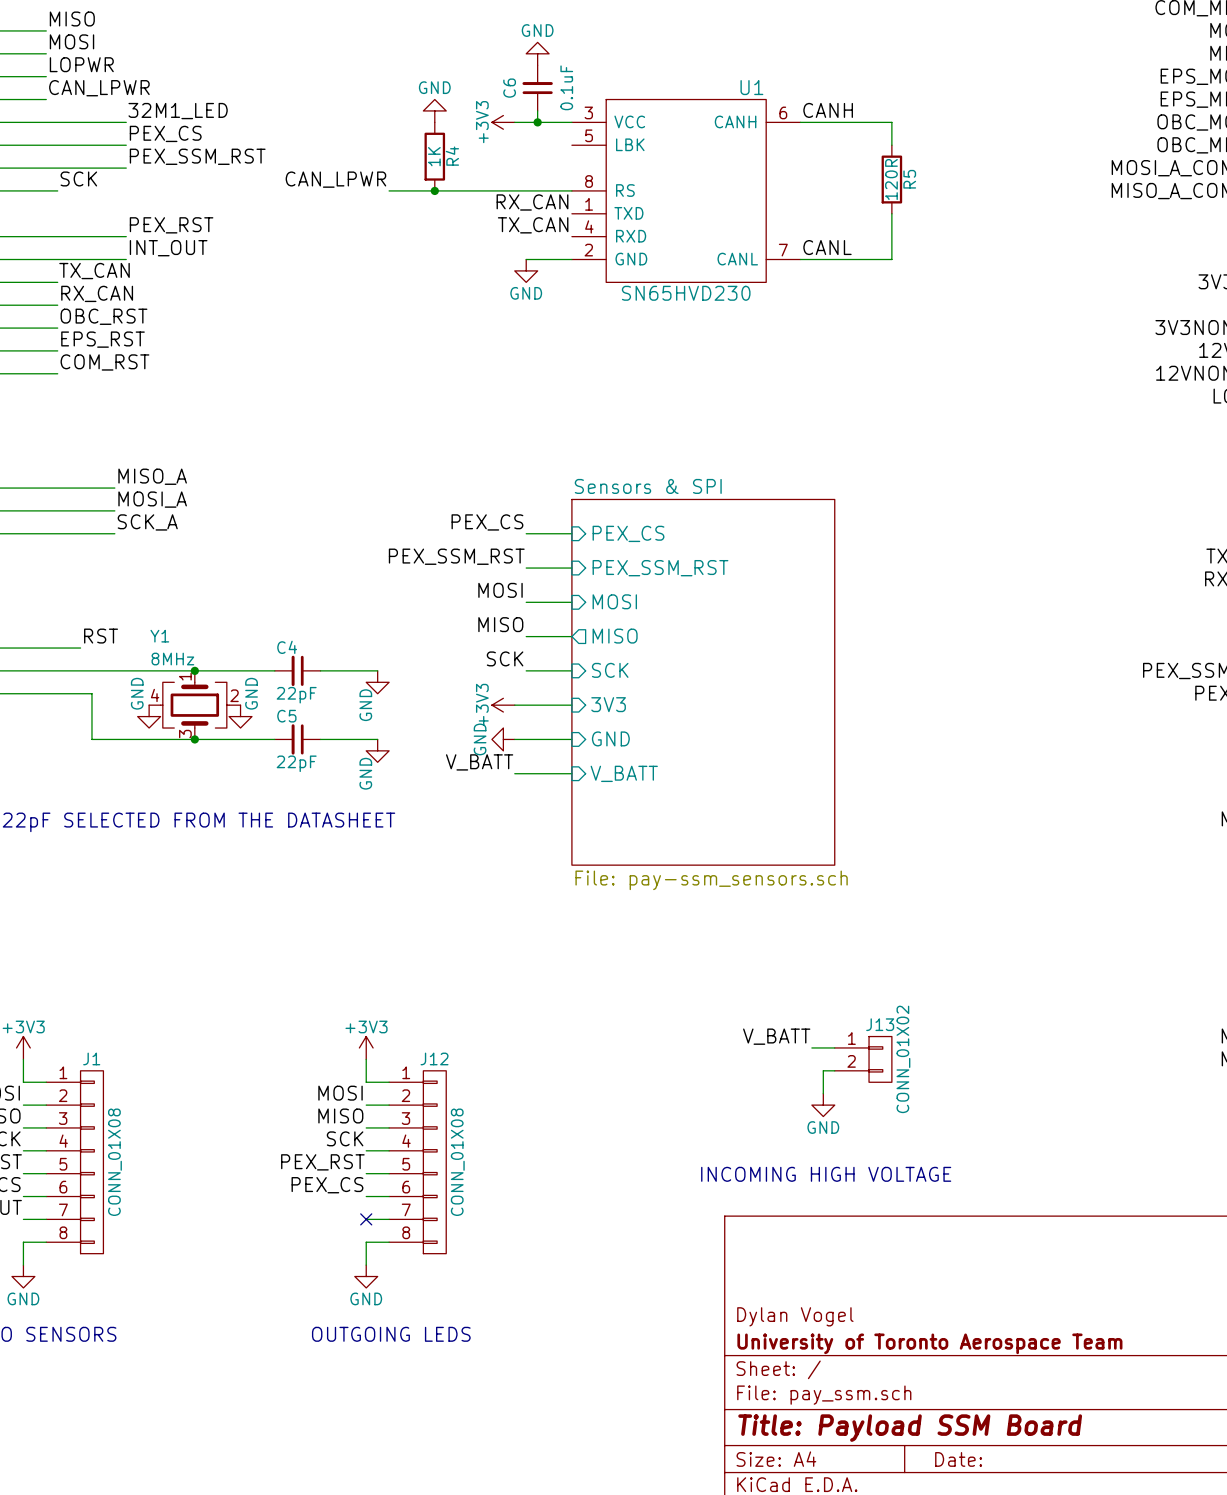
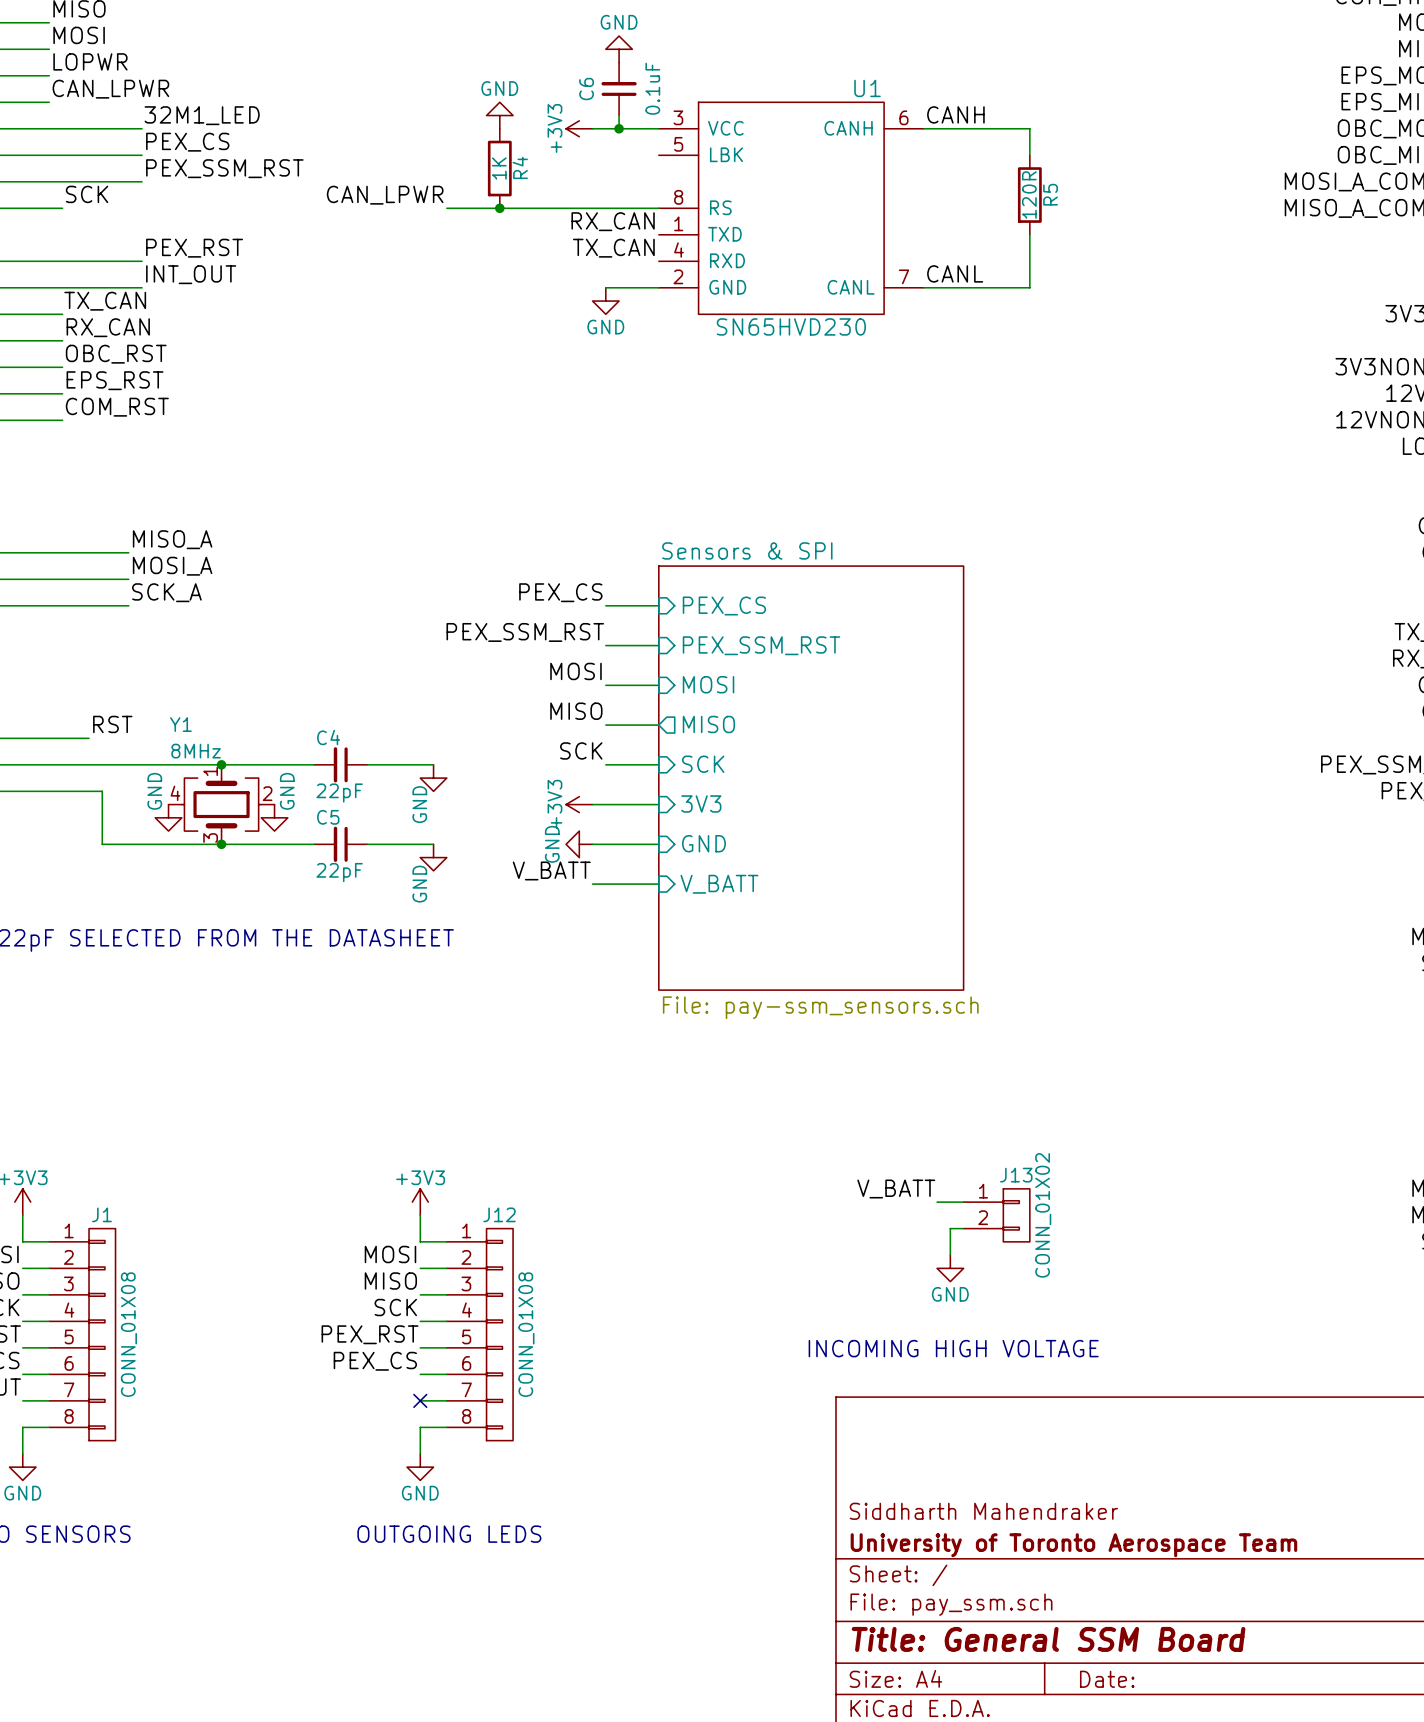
title block: Dylan Vogel (795, 1316) -> Siddharth Mahendraker (983, 1511)
title block: Title: Payload SSM Board (910, 1428) -> Title: General SSM Board (1048, 1639)

